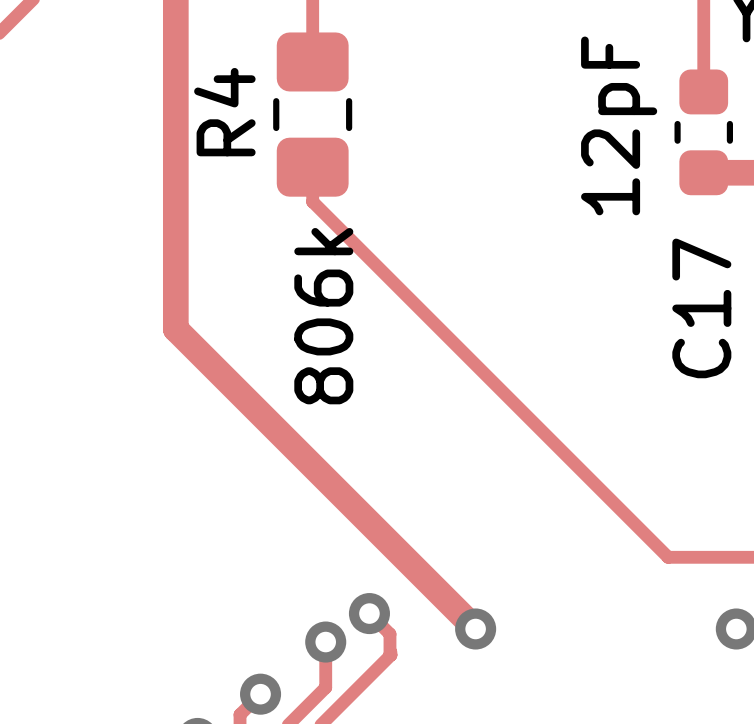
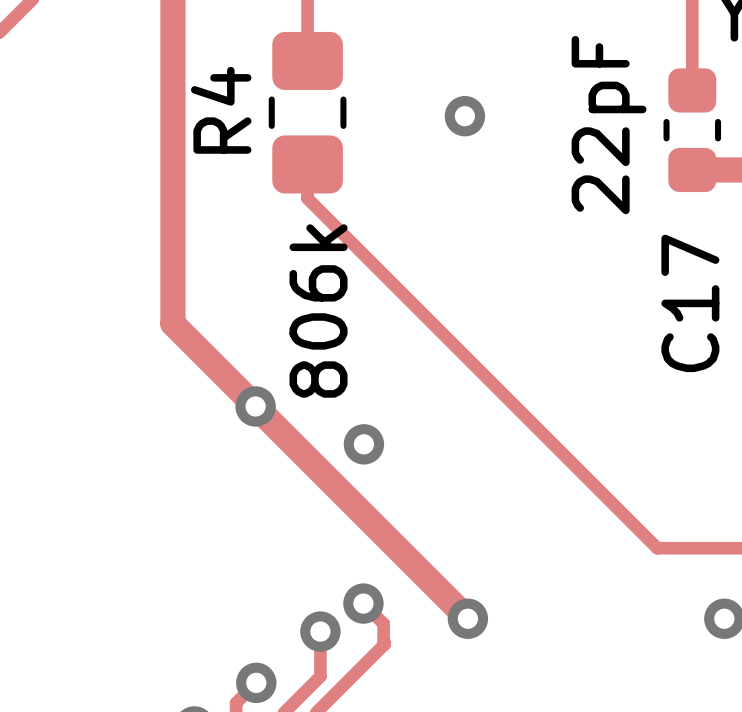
via: none -> (464, 116)
C17 value: 12pF (619, 125) -> 22pF (609, 125)
via: none -> (255, 406)
via: none -> (363, 444)

